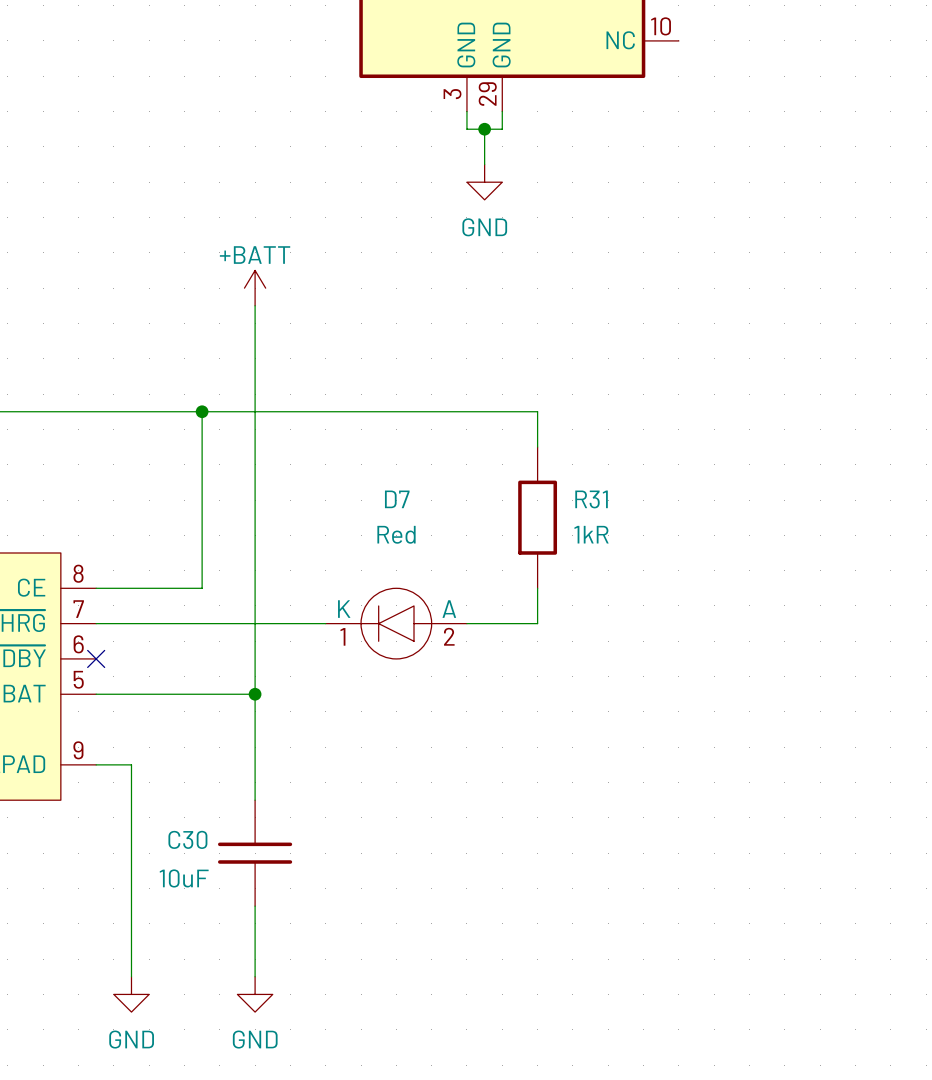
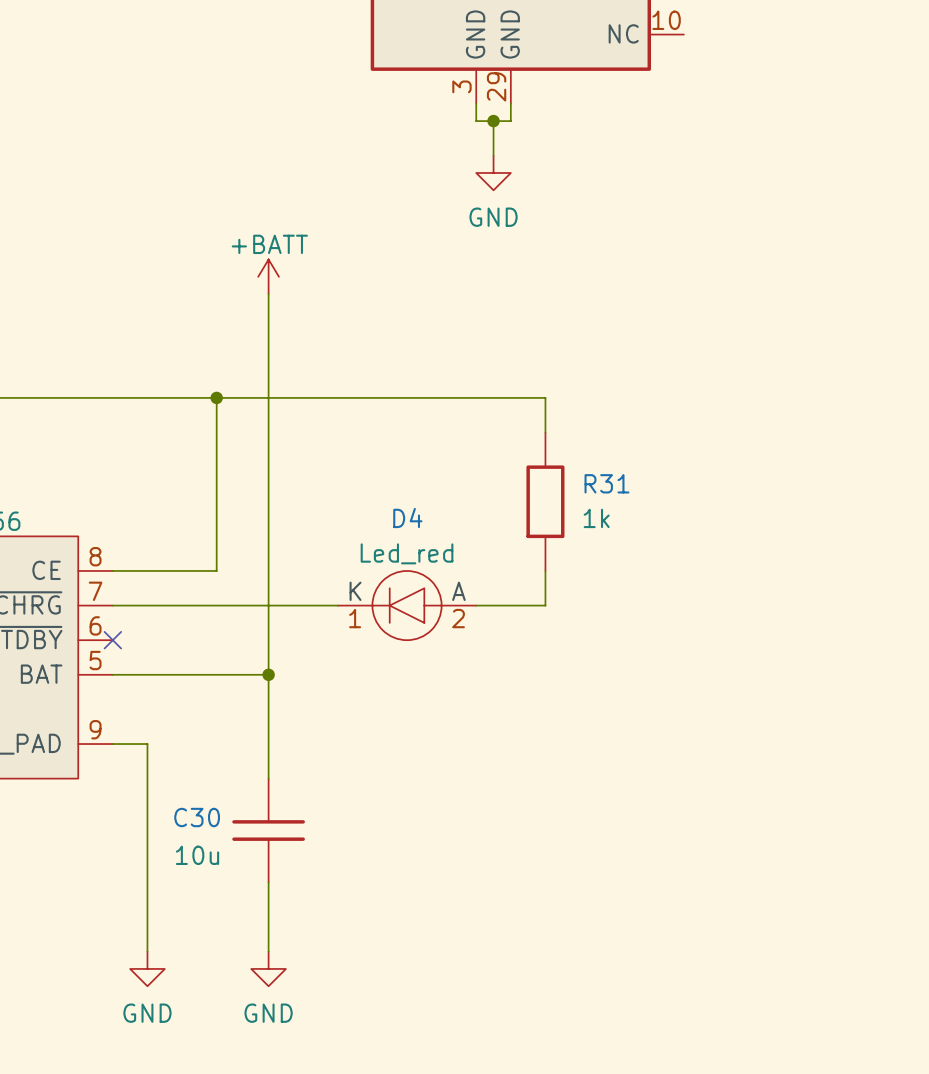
D7 name: D7 (397, 499) -> D4 (407, 518)
D7 value: Red (396, 534) -> Led_red (407, 553)
R31 value: 1kR (591, 534) -> 1k (596, 518)
C30 value: 10uF (184, 878) -> 10u (197, 855)

